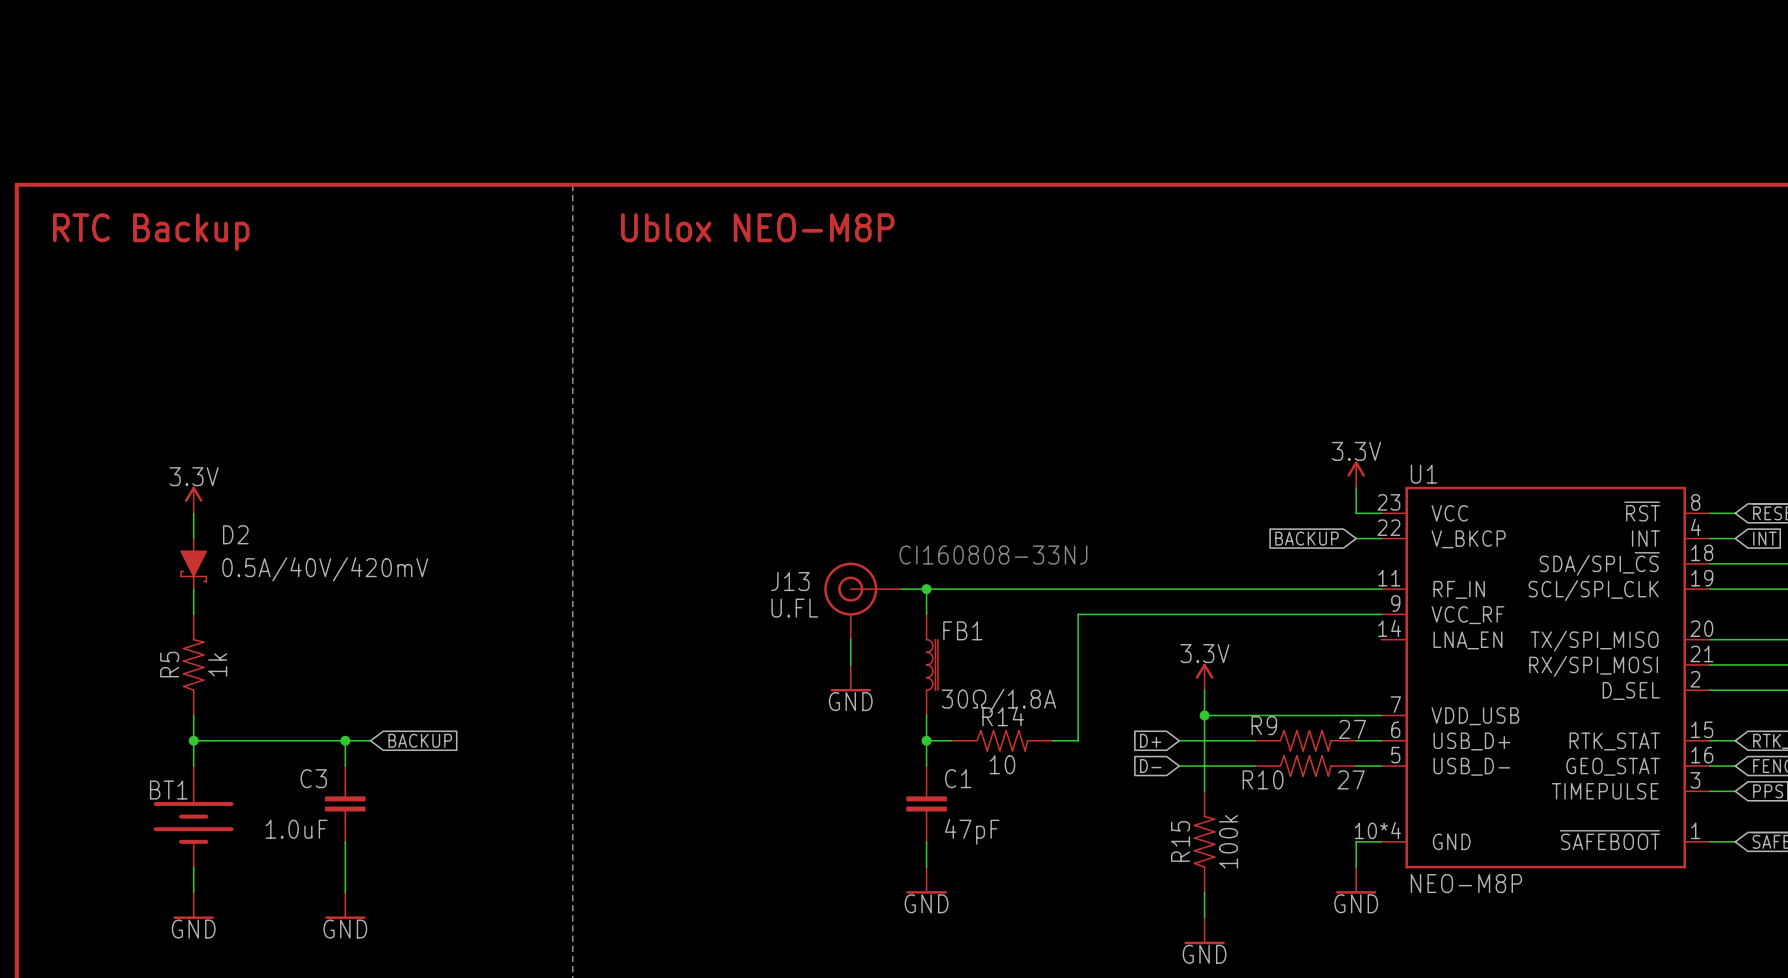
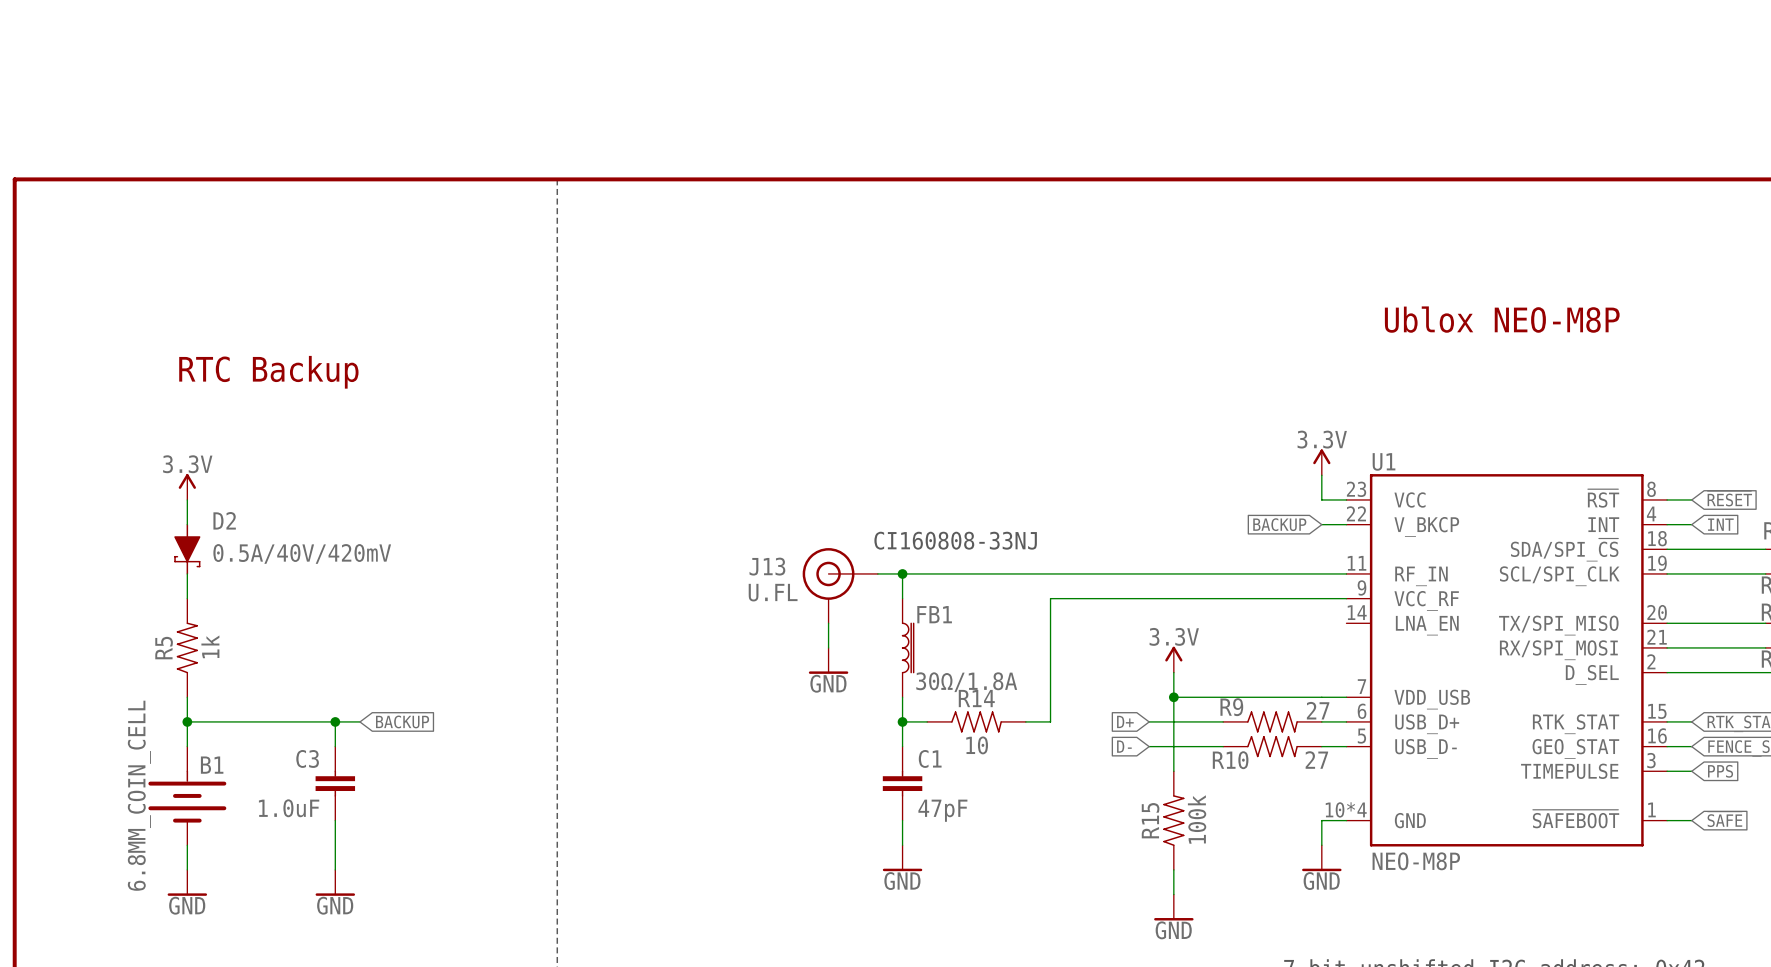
text: Ublox NEO-M8P (757, 227) -> none
text position: RTC Backup (151, 231) -> RTC Backup (268, 372)
text: none -> Ublox NEO-M8P (1502, 319)
BT1 name: BT1 (168, 790) -> B1 (212, 765)
BT1 value: none -> 6.8MM_COIN_CELL (139, 795)

